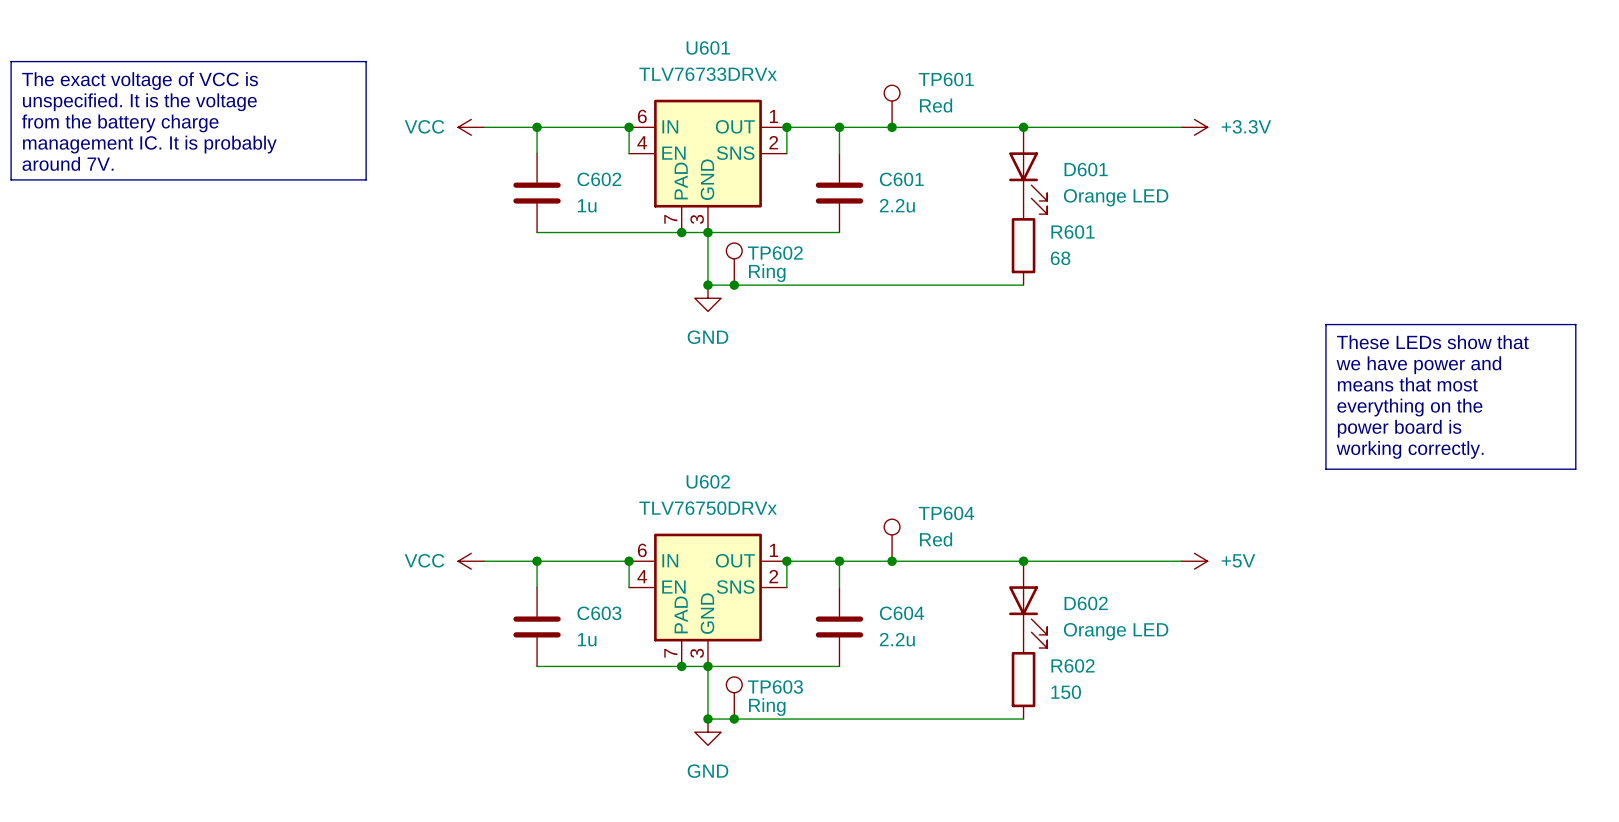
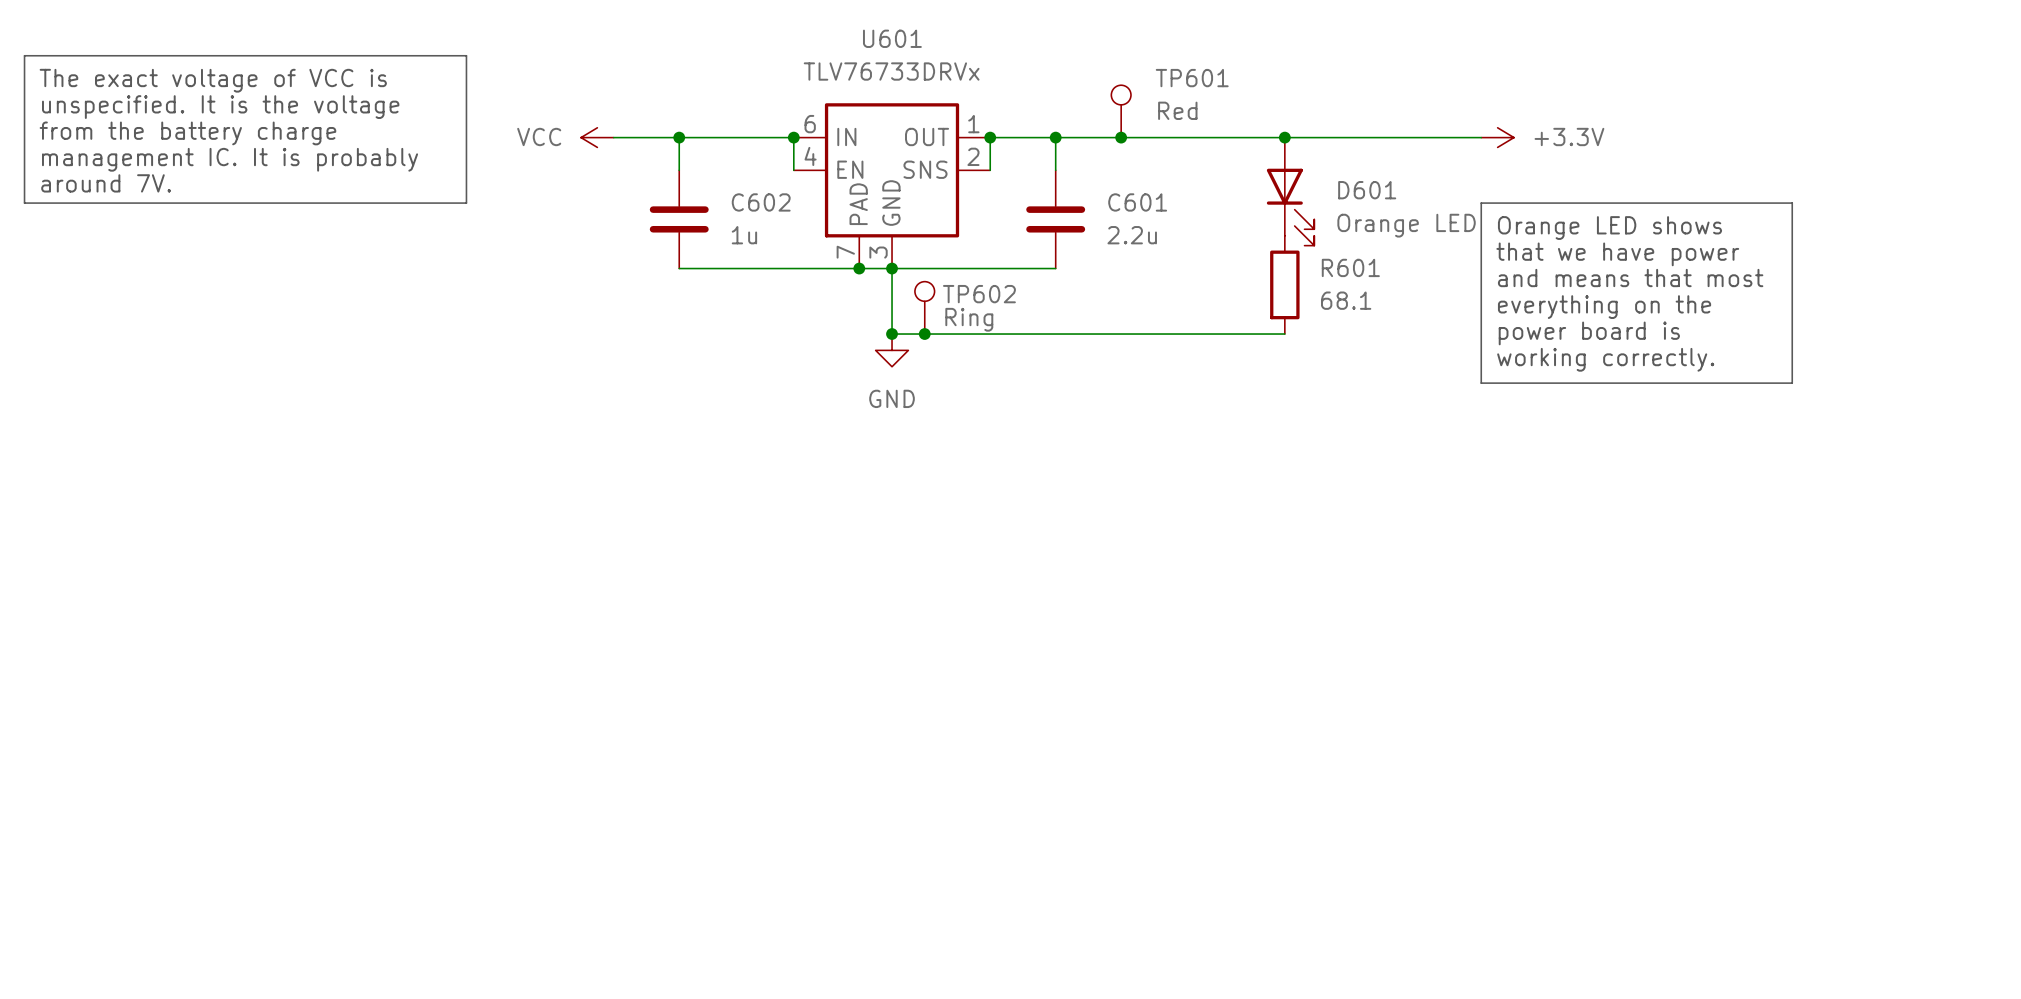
text: none -> Orange LED shows (1609, 228)
text: none -> that we have power (1617, 254)
text: none -> and means that most (1630, 278)
R601 value: 68 (1060, 258) -> 68.1 (1346, 300)
line: (1325, 324) (1325, 469) (1575, 469) (1575, 324) (1431, 324) -> (1661, 383) (1481, 383) (1481, 203) (1792, 203) (1792, 383)
text: These LEDs show that (1432, 342) -> none
text: we have power and (1418, 365) -> none
text: means that most (1407, 384) -> none
text position: everything on the (1409, 407) -> everything on the (1604, 307)
text position: power board is (1399, 428) -> power board is (1589, 333)
text position: working correctly. (1410, 449) -> working correctly. (1605, 359)
TP604: Red (892, 540) -> none
power symbol: VCC (471, 561) -> none
wire: (484, 561) (629, 561) (629, 587) -> none
wire: (537, 561) (537, 587) -> none
junction: (537, 561) -> none
junction: (629, 561) -> none
junction: (786, 561) -> none
wire: (839, 561) (839, 587) -> none
junction: (839, 561) -> none
junction: (892, 561) -> none
junction: (1023, 561) -> none
wire: (1181, 561) (786, 561) (786, 587) -> none
power symbol: +5V (1194, 561) -> none
U602: TLV76750DRVx (707, 600) -> none
D602: Orange LED (1028, 604) -> none
C603: 1u (537, 626) -> none
C604: 2.2u (839, 626) -> none
wire: (537, 666) (839, 666) -> none
junction: (681, 666) -> none
wire: (707, 666) (707, 719) (1023, 719) -> none
junction: (707, 666) -> none
R602: 150 (1023, 679) -> none
TP603: Ring (734, 697) -> none
junction: (707, 719) -> none
junction: (734, 719) -> none
power symbol: GND (707, 732) -> none

